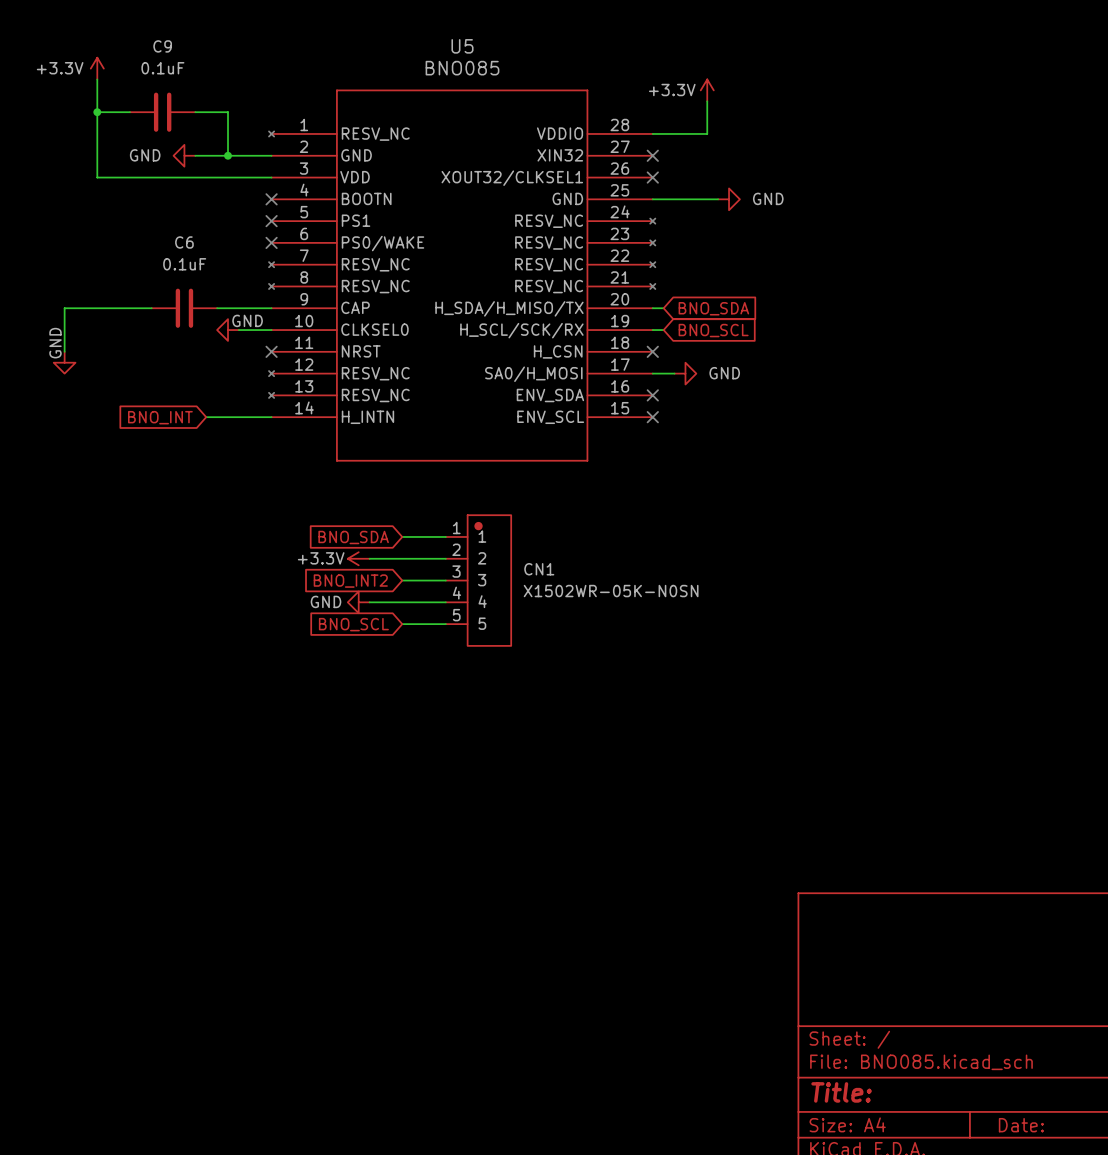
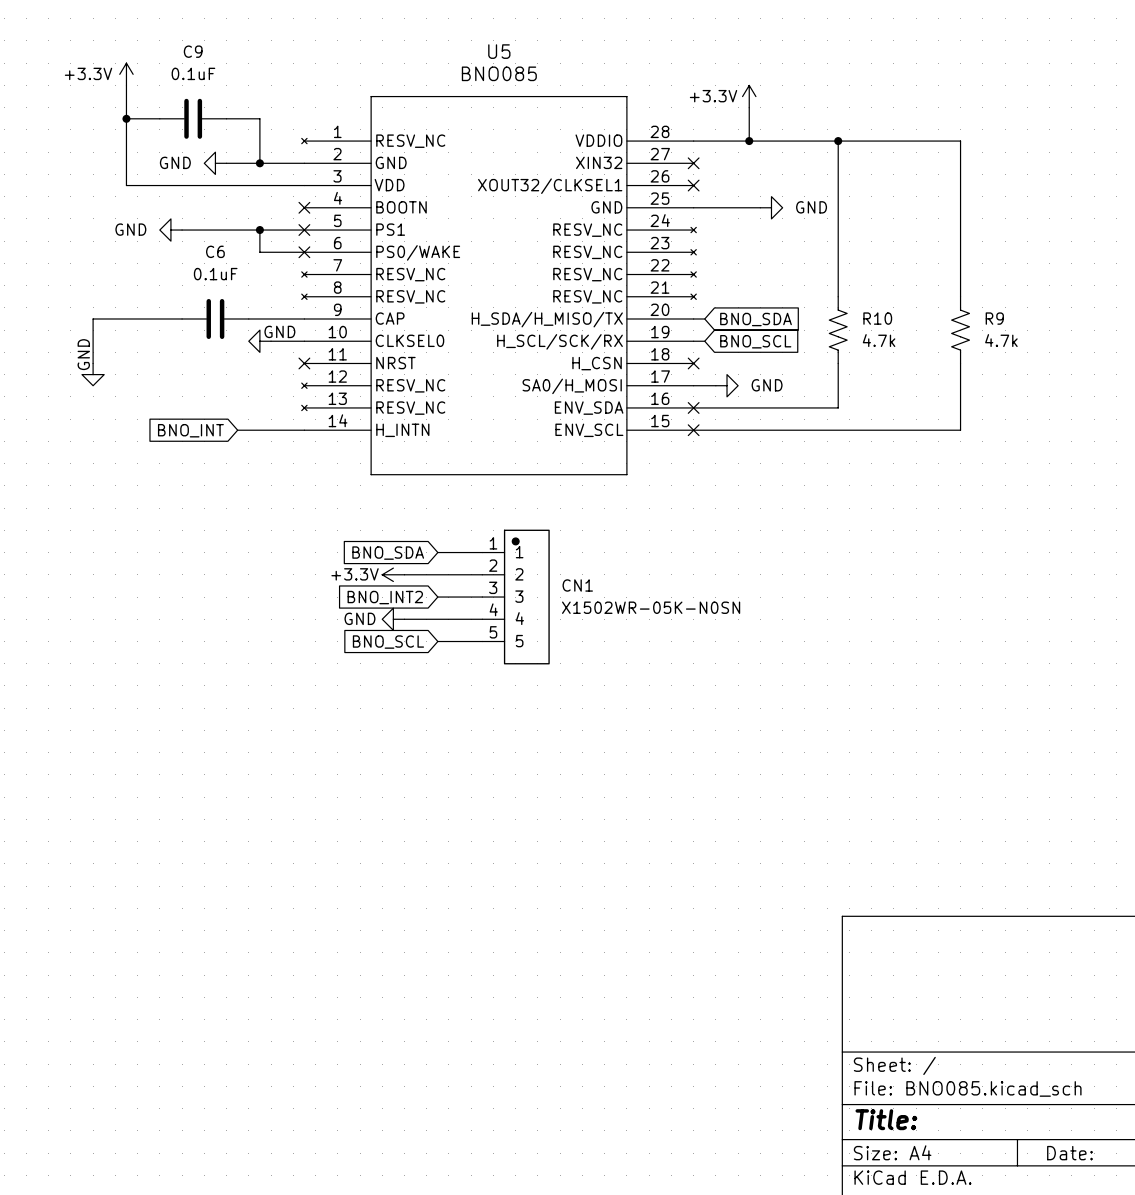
wire: none -> (749, 141) (960, 141) (960, 296)
junction: none -> (749, 141)
wire: none -> (838, 141) (838, 296)
junction: none -> (838, 141)
power symbol: none -> GND (170, 230)
wire: none -> (182, 230) (304, 230)
wire: none -> (259, 230) (259, 252) (304, 252)
junction: none -> (259, 230)
R10: none -> 4.7k (838, 330)
R9: none -> 4.7k (960, 330)
wire: none -> (838, 363) (838, 407) (693, 407)
wire: none -> (960, 363) (960, 430) (693, 430)

